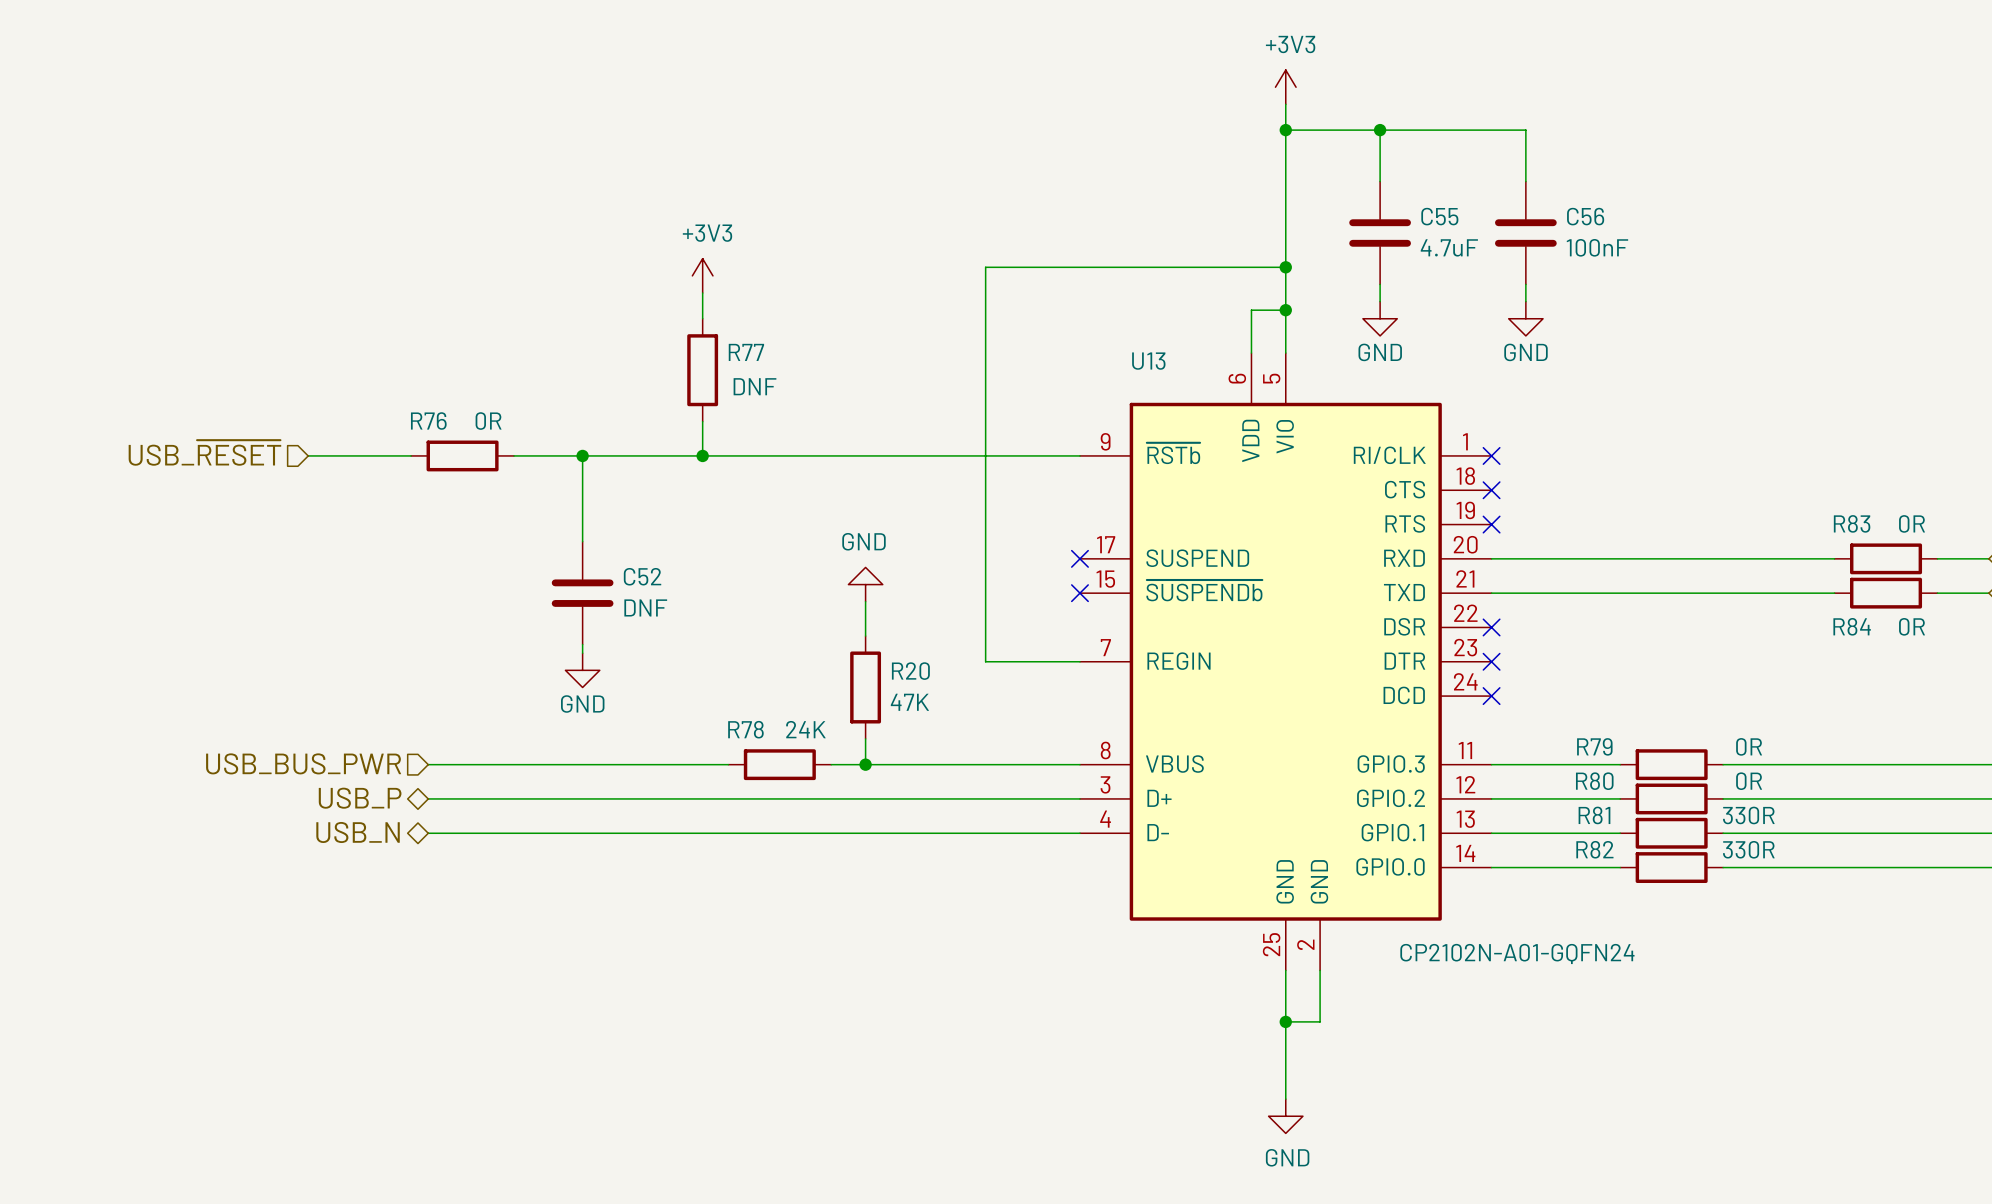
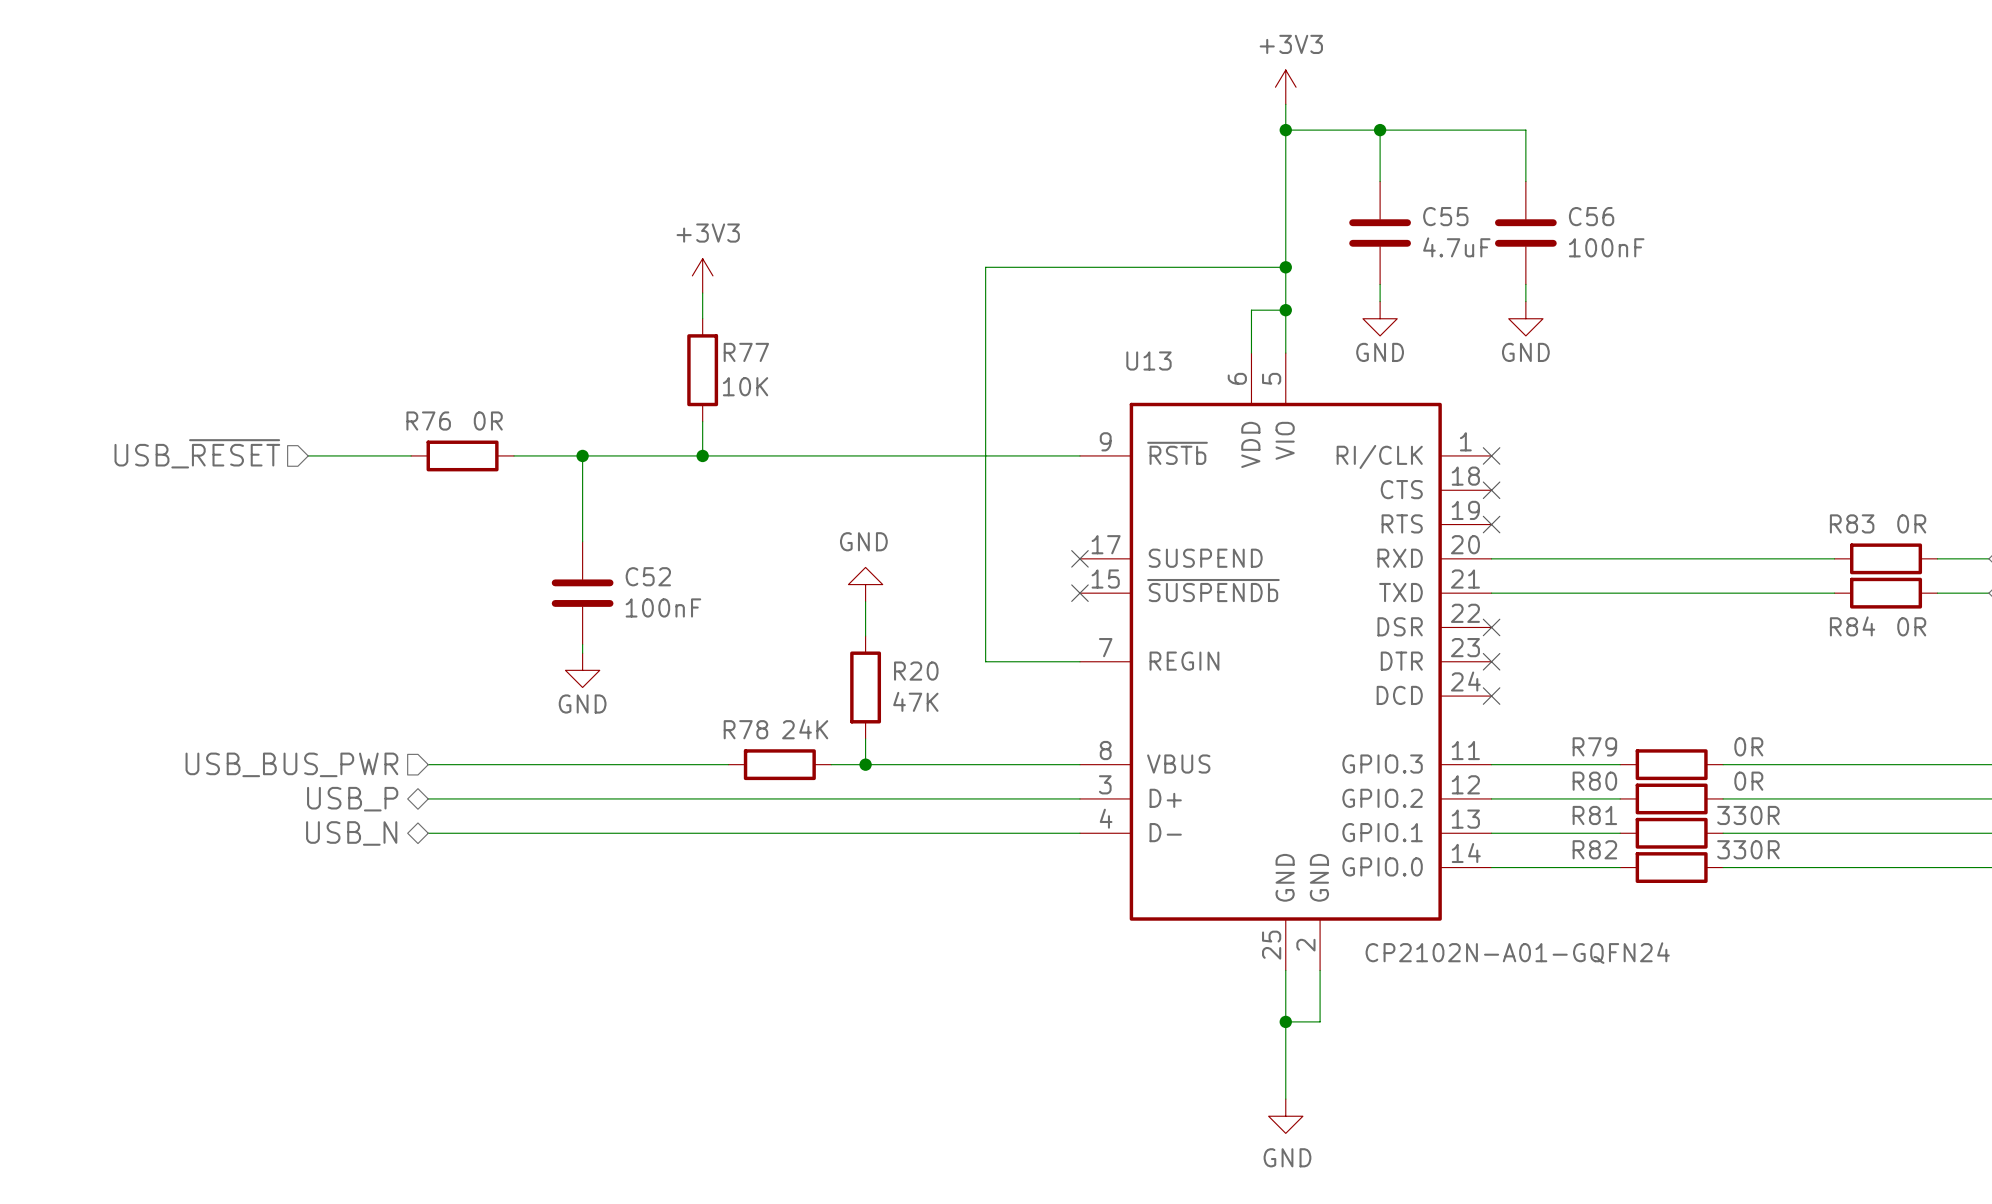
R77 value: DNF (754, 386) -> 10K (745, 386)
C52 value: DNF (645, 607) -> 100nF (663, 607)

